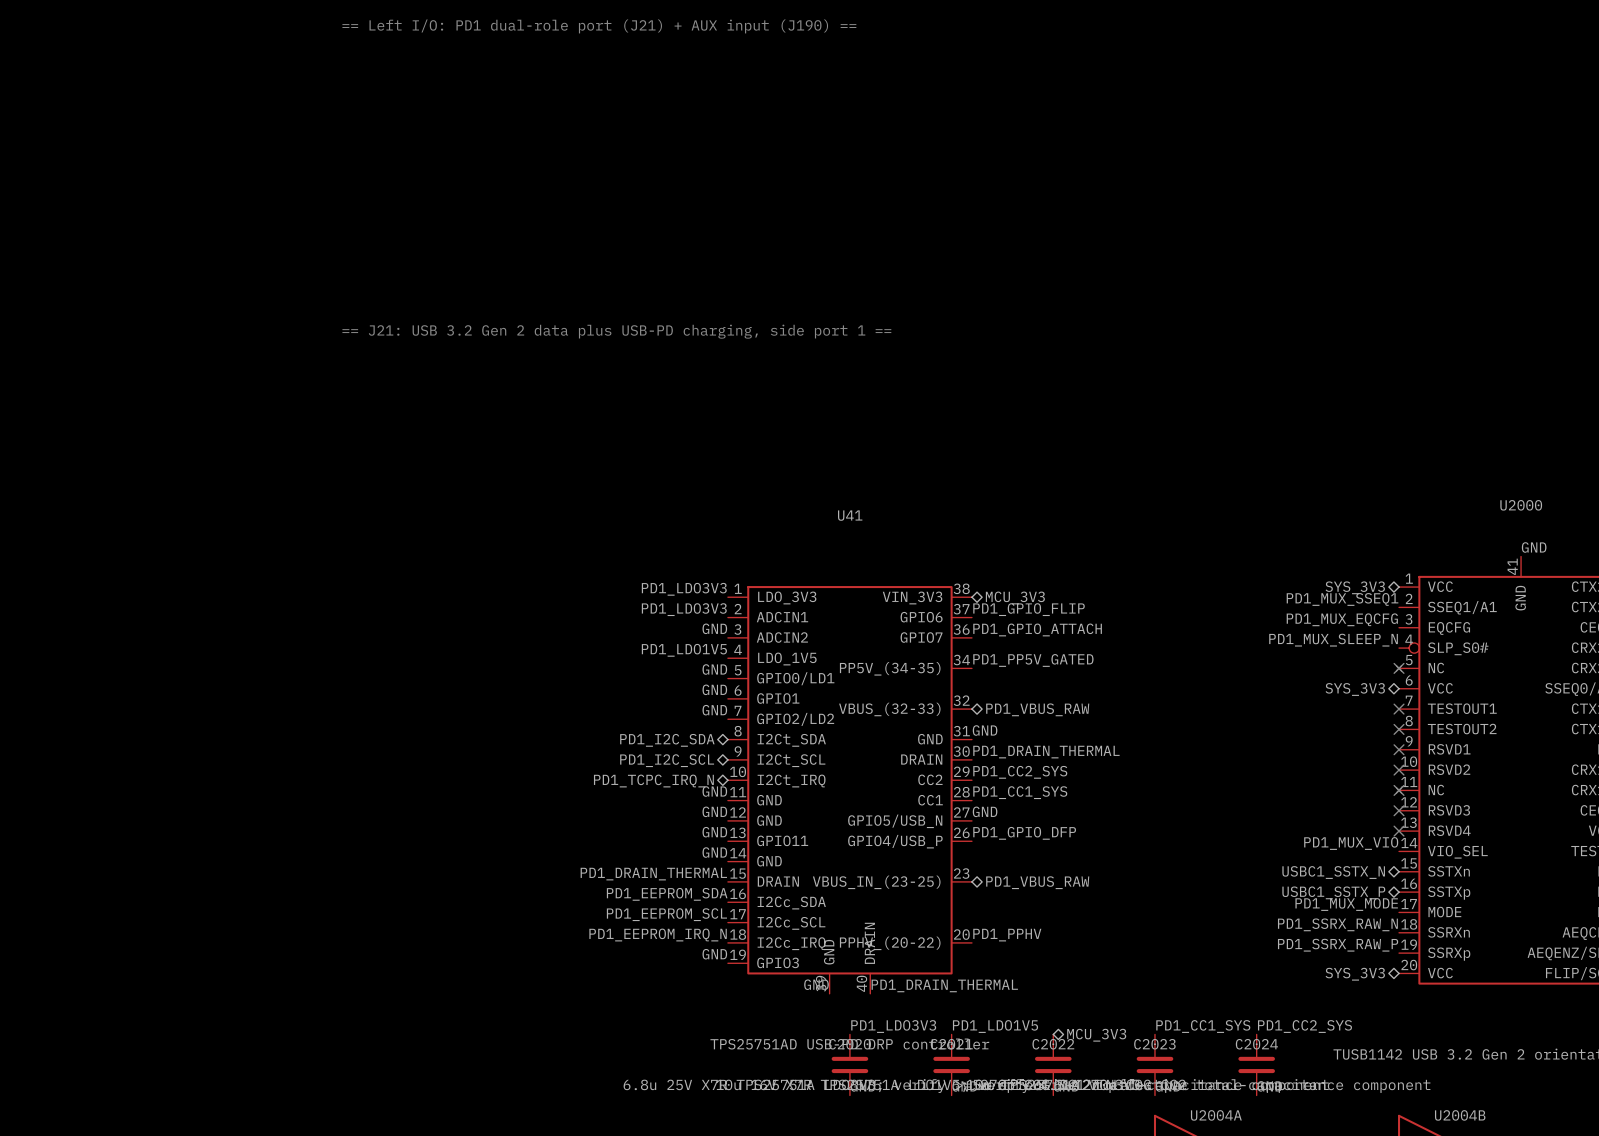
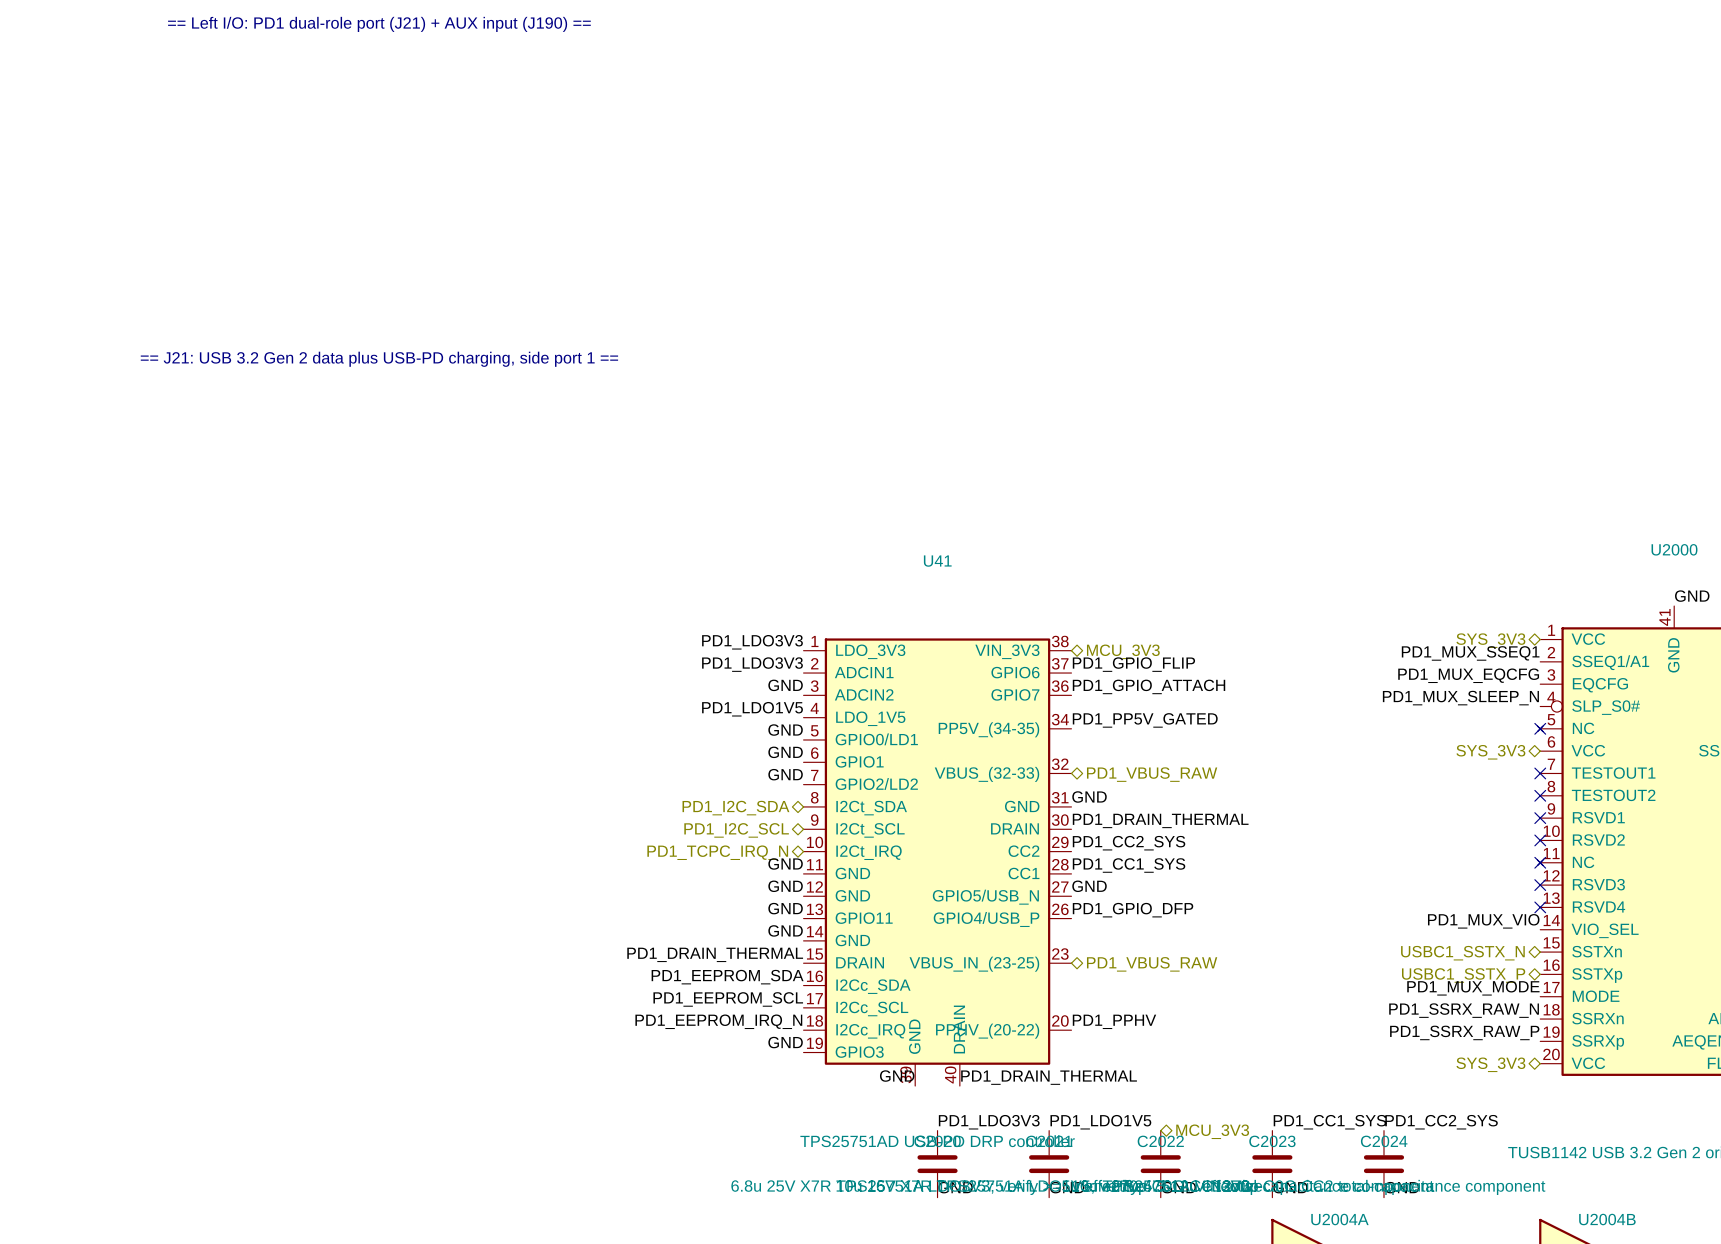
text position: == Left I/O: PD1 dual-role port (J21) + AUX input (J190) == (599, 26) -> == Left I/O: PD1 dual-role port (J21) + AUX input (J190) == (379, 24)
text position: == J21: USB 3.2 Gen 2 data plus USB-PD charging, side port 1 == (616, 331) -> == J21: USB 3.2 Gen 2 data plus USB-PD charging, side port 1 == (379, 359)

